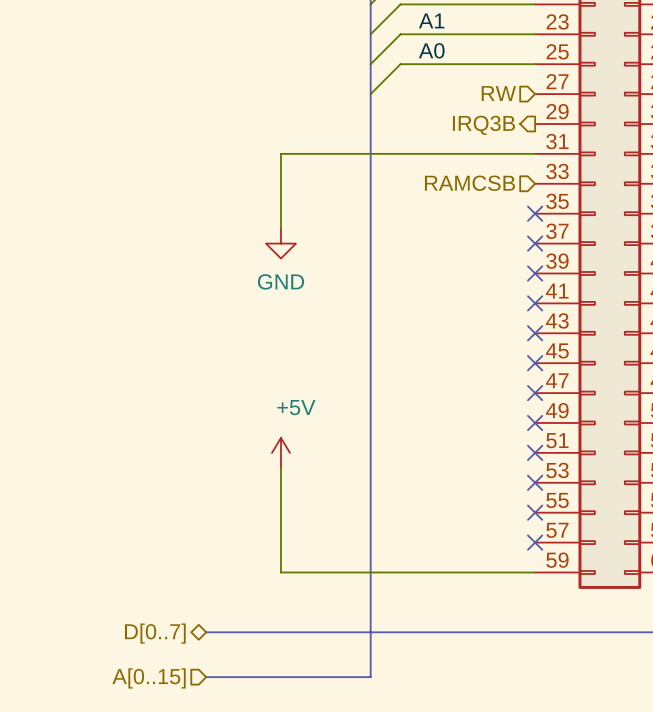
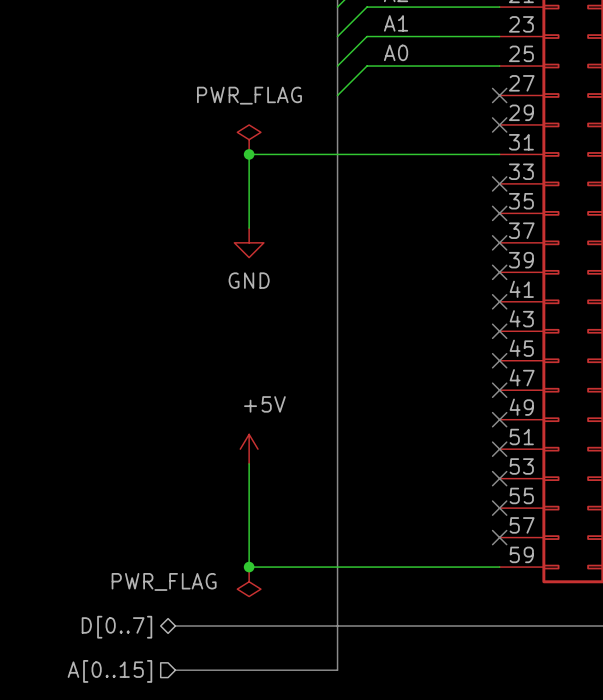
hierarchical label: RW (498, 93) -> none
no-connect mark: none -> (499, 95)
no-connect mark: none -> (499, 124)
hierarchical label: IRQ3B (483, 125) -> none
power symbol: none -> PWR_FLAG (249, 139)
junction: none -> (249, 154)
hierarchical label: RAMCSB (469, 183) -> none
no-connect mark: none -> (499, 183)
junction: none -> (249, 567)
power symbol: none -> PWR_FLAG (249, 581)

